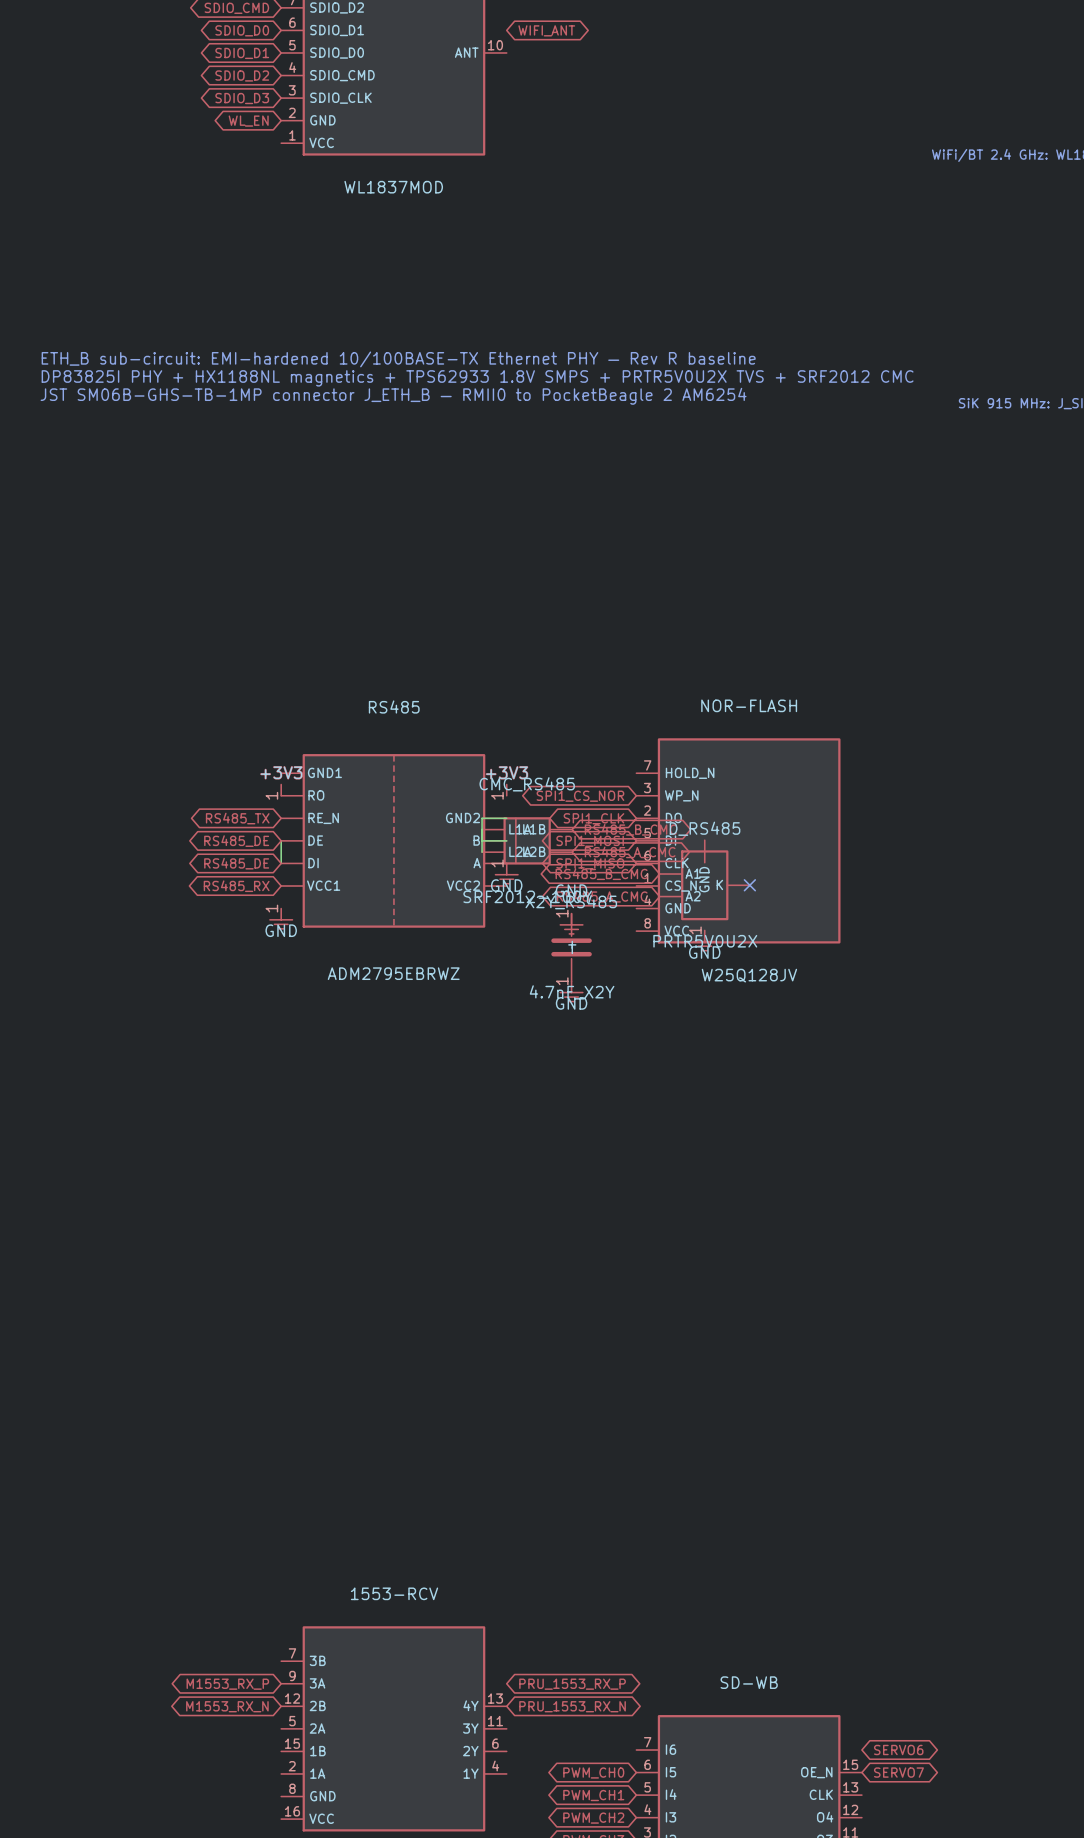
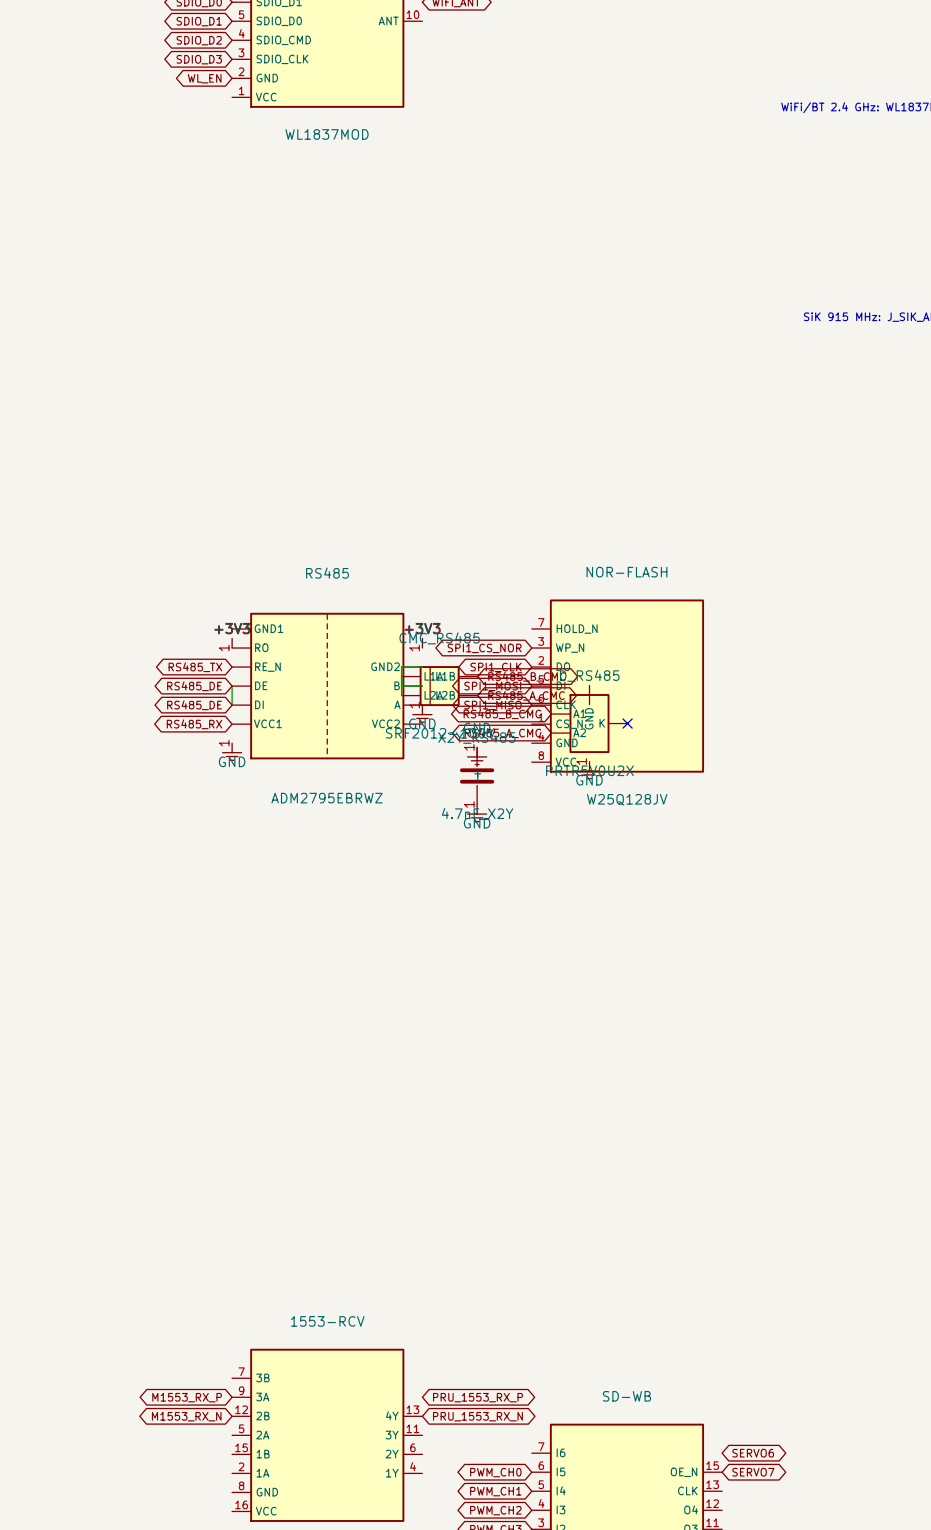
text: ETH_B sub-circuit: EMI-hardened 10/100BASE-TX Ethernet PHY — Rev R baseline (398, 359) -> none
text: DP83825I PHY + HX1188NL magnetics + TPS62933 1.8V SMPS + PRTR5V0U2X TVS + SRF2012 CMC (477, 378) -> none
text: JST SM06B-GHS-TB-1MP connector J_ETH_B — RMII0 to PocketBeagle 2 AM6254 (393, 396) -> none

